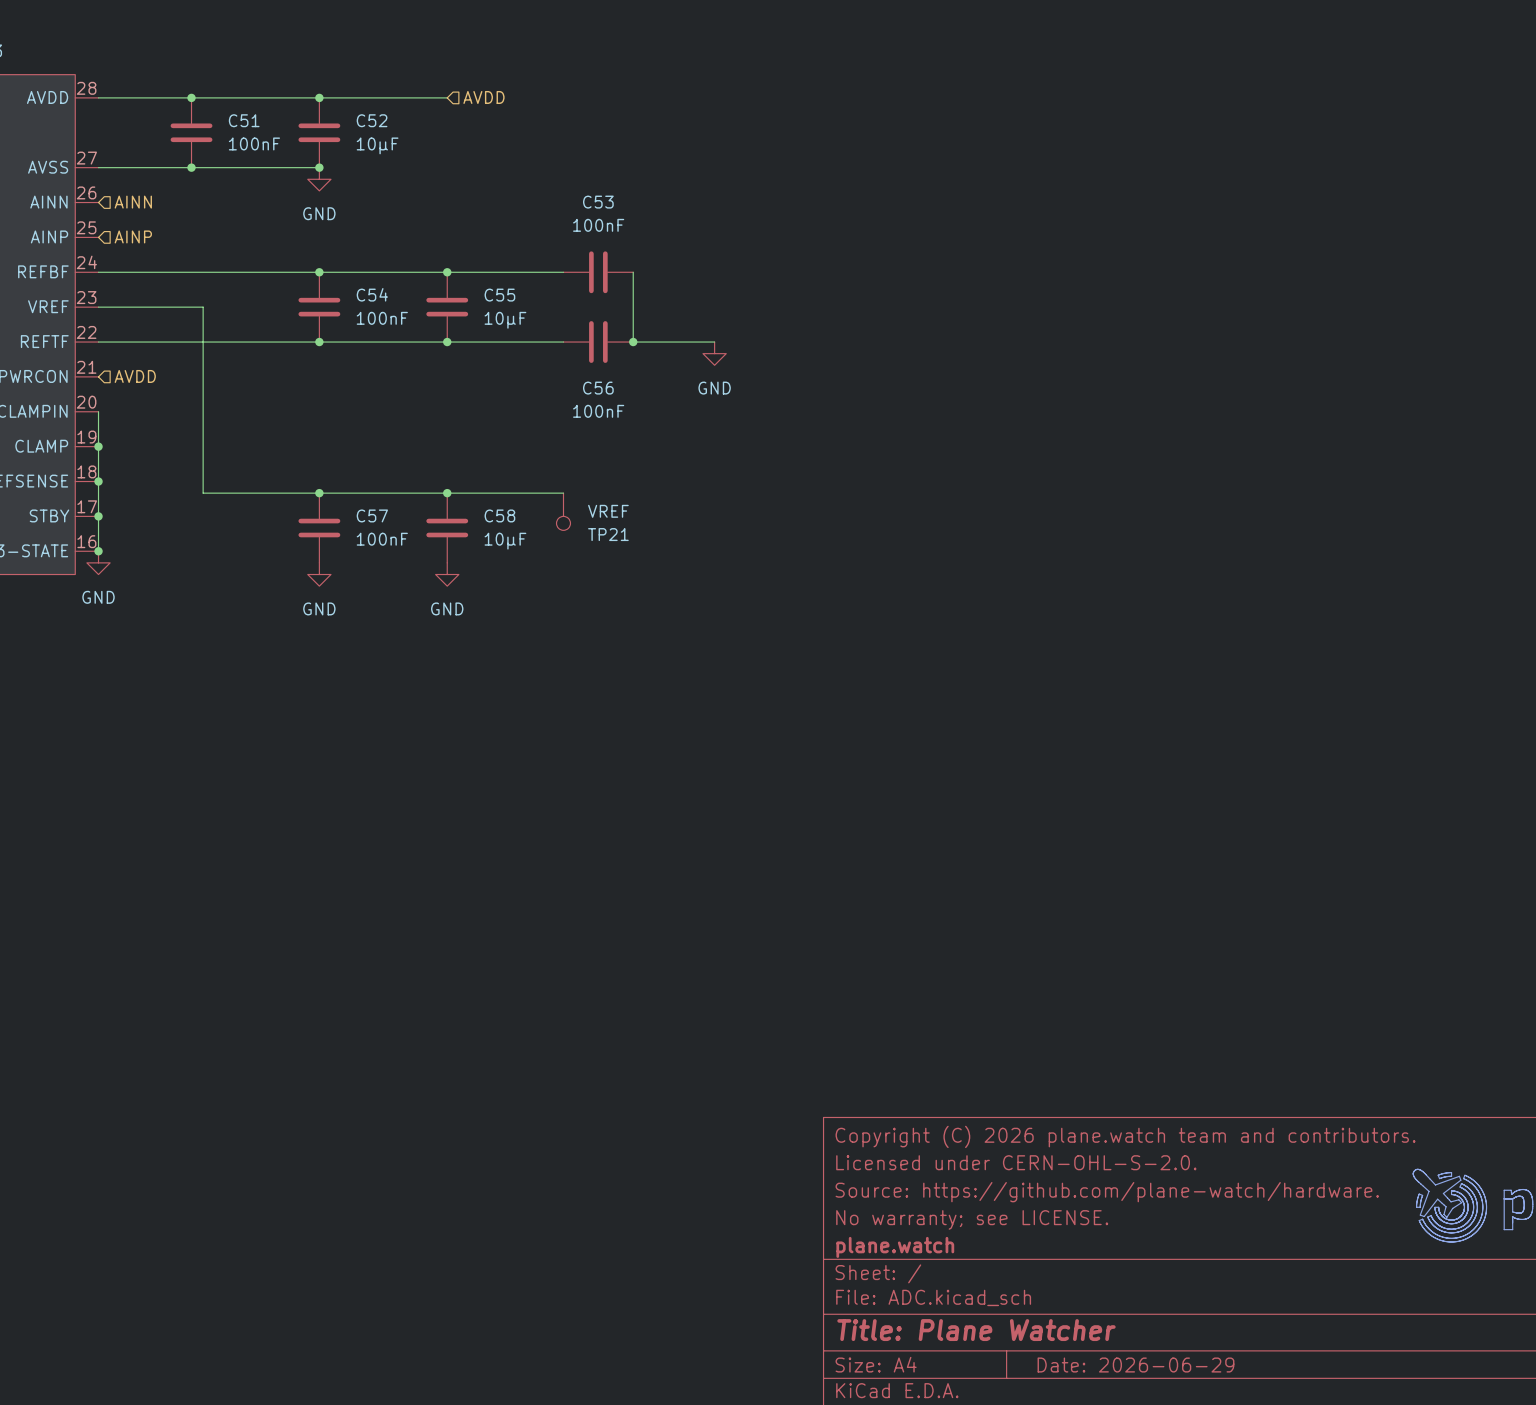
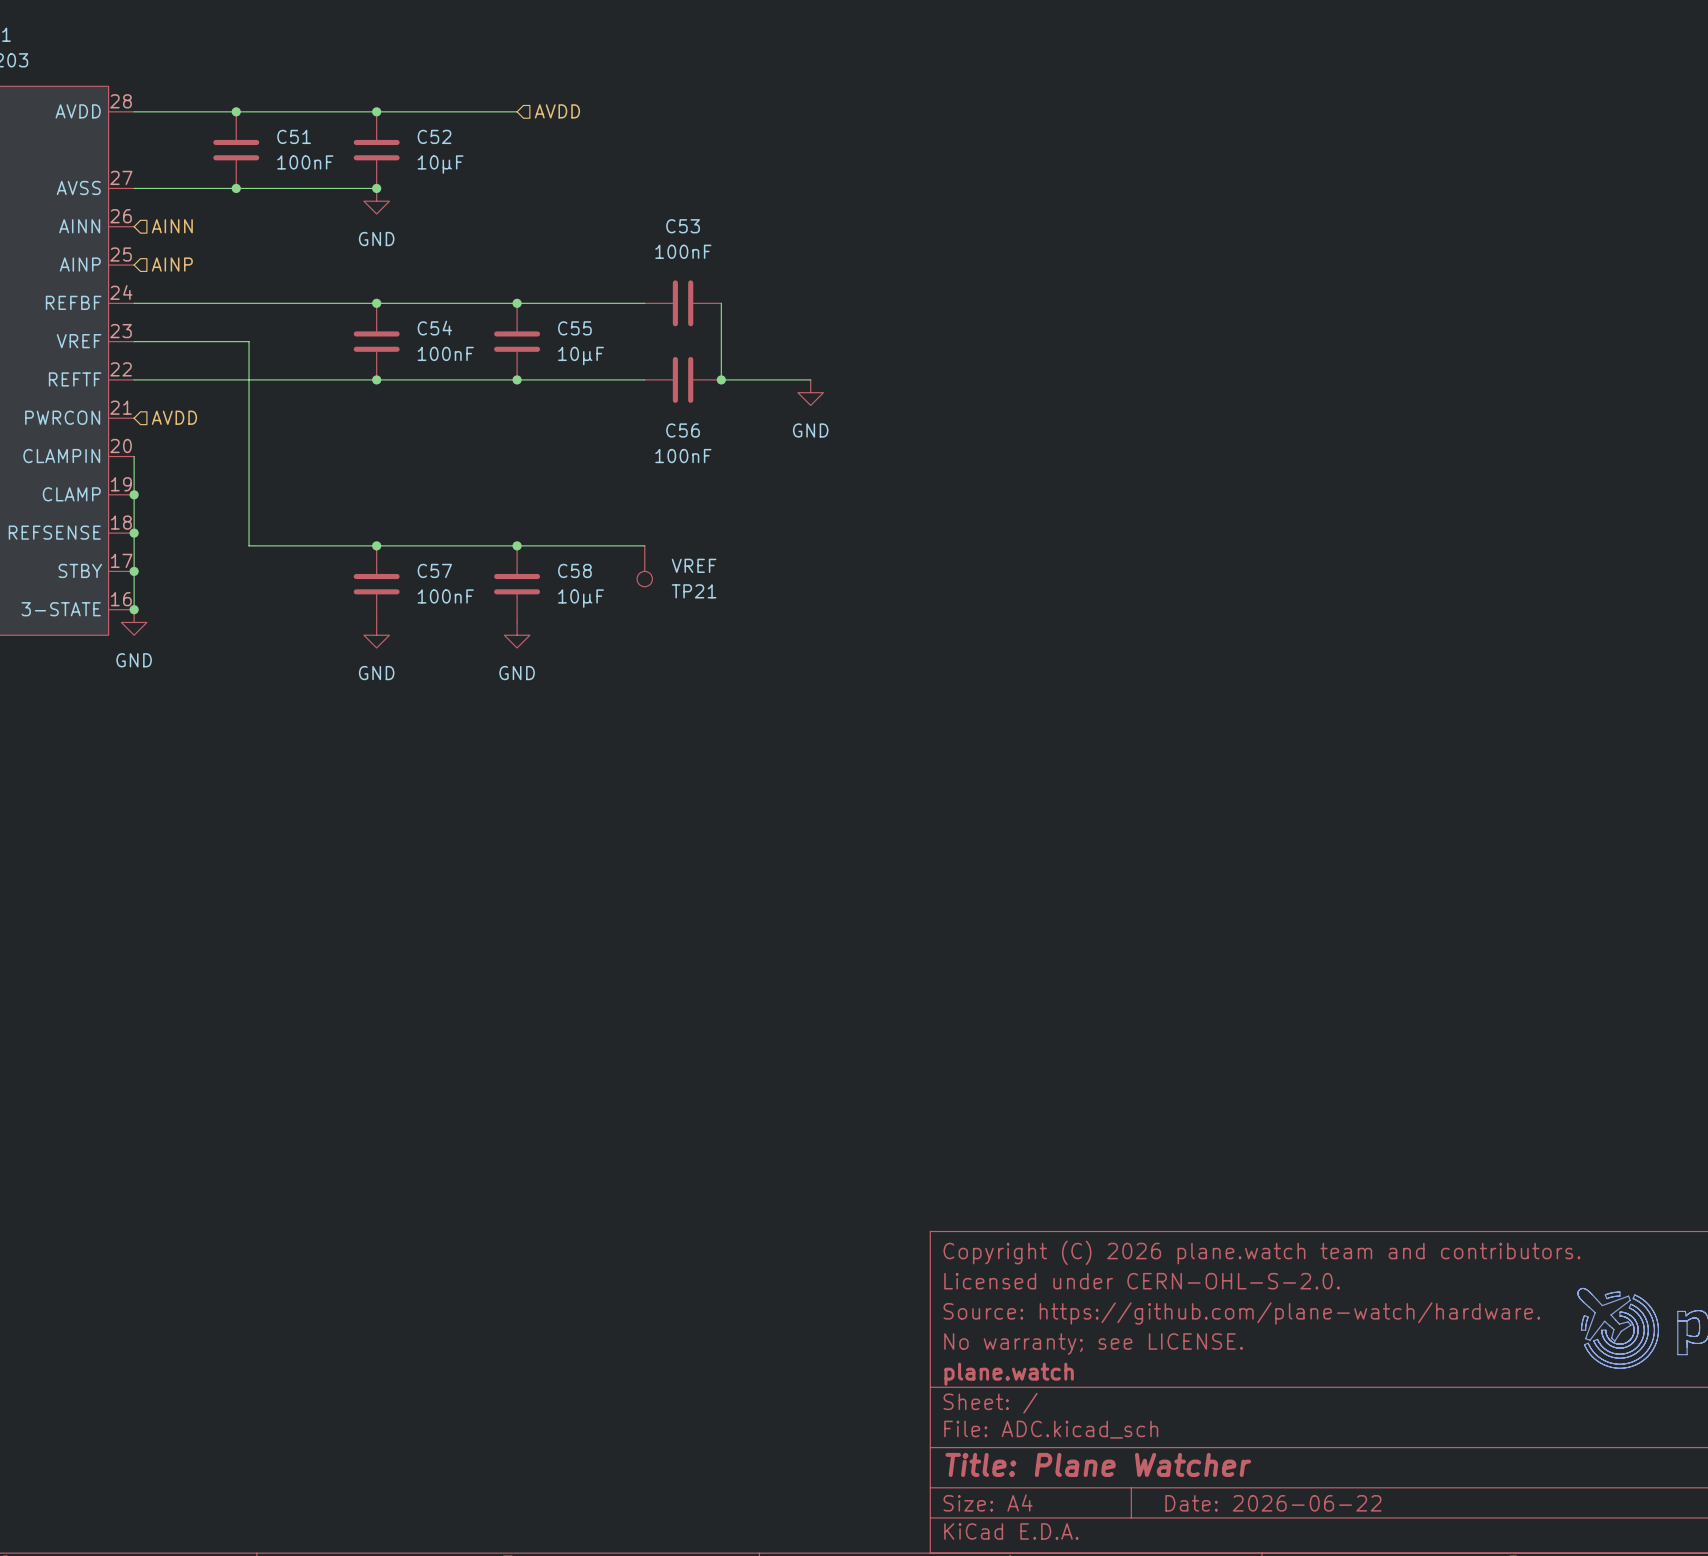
title block: Date: 2026-06-29 (1135, 1365) -> Date: 2026-06-22 (1273, 1503)

